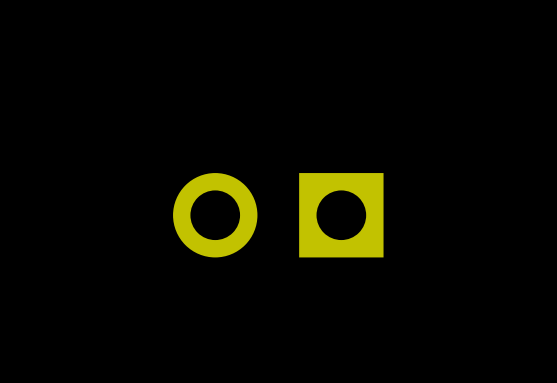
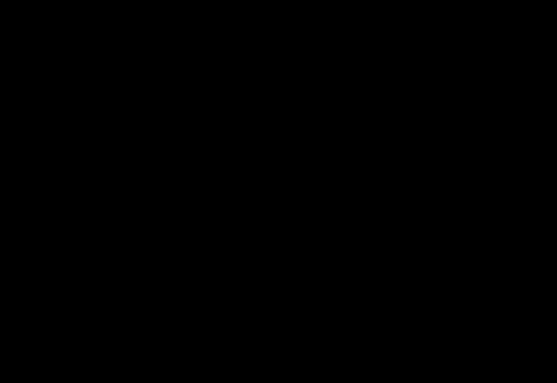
part: (278, 215) -> none

